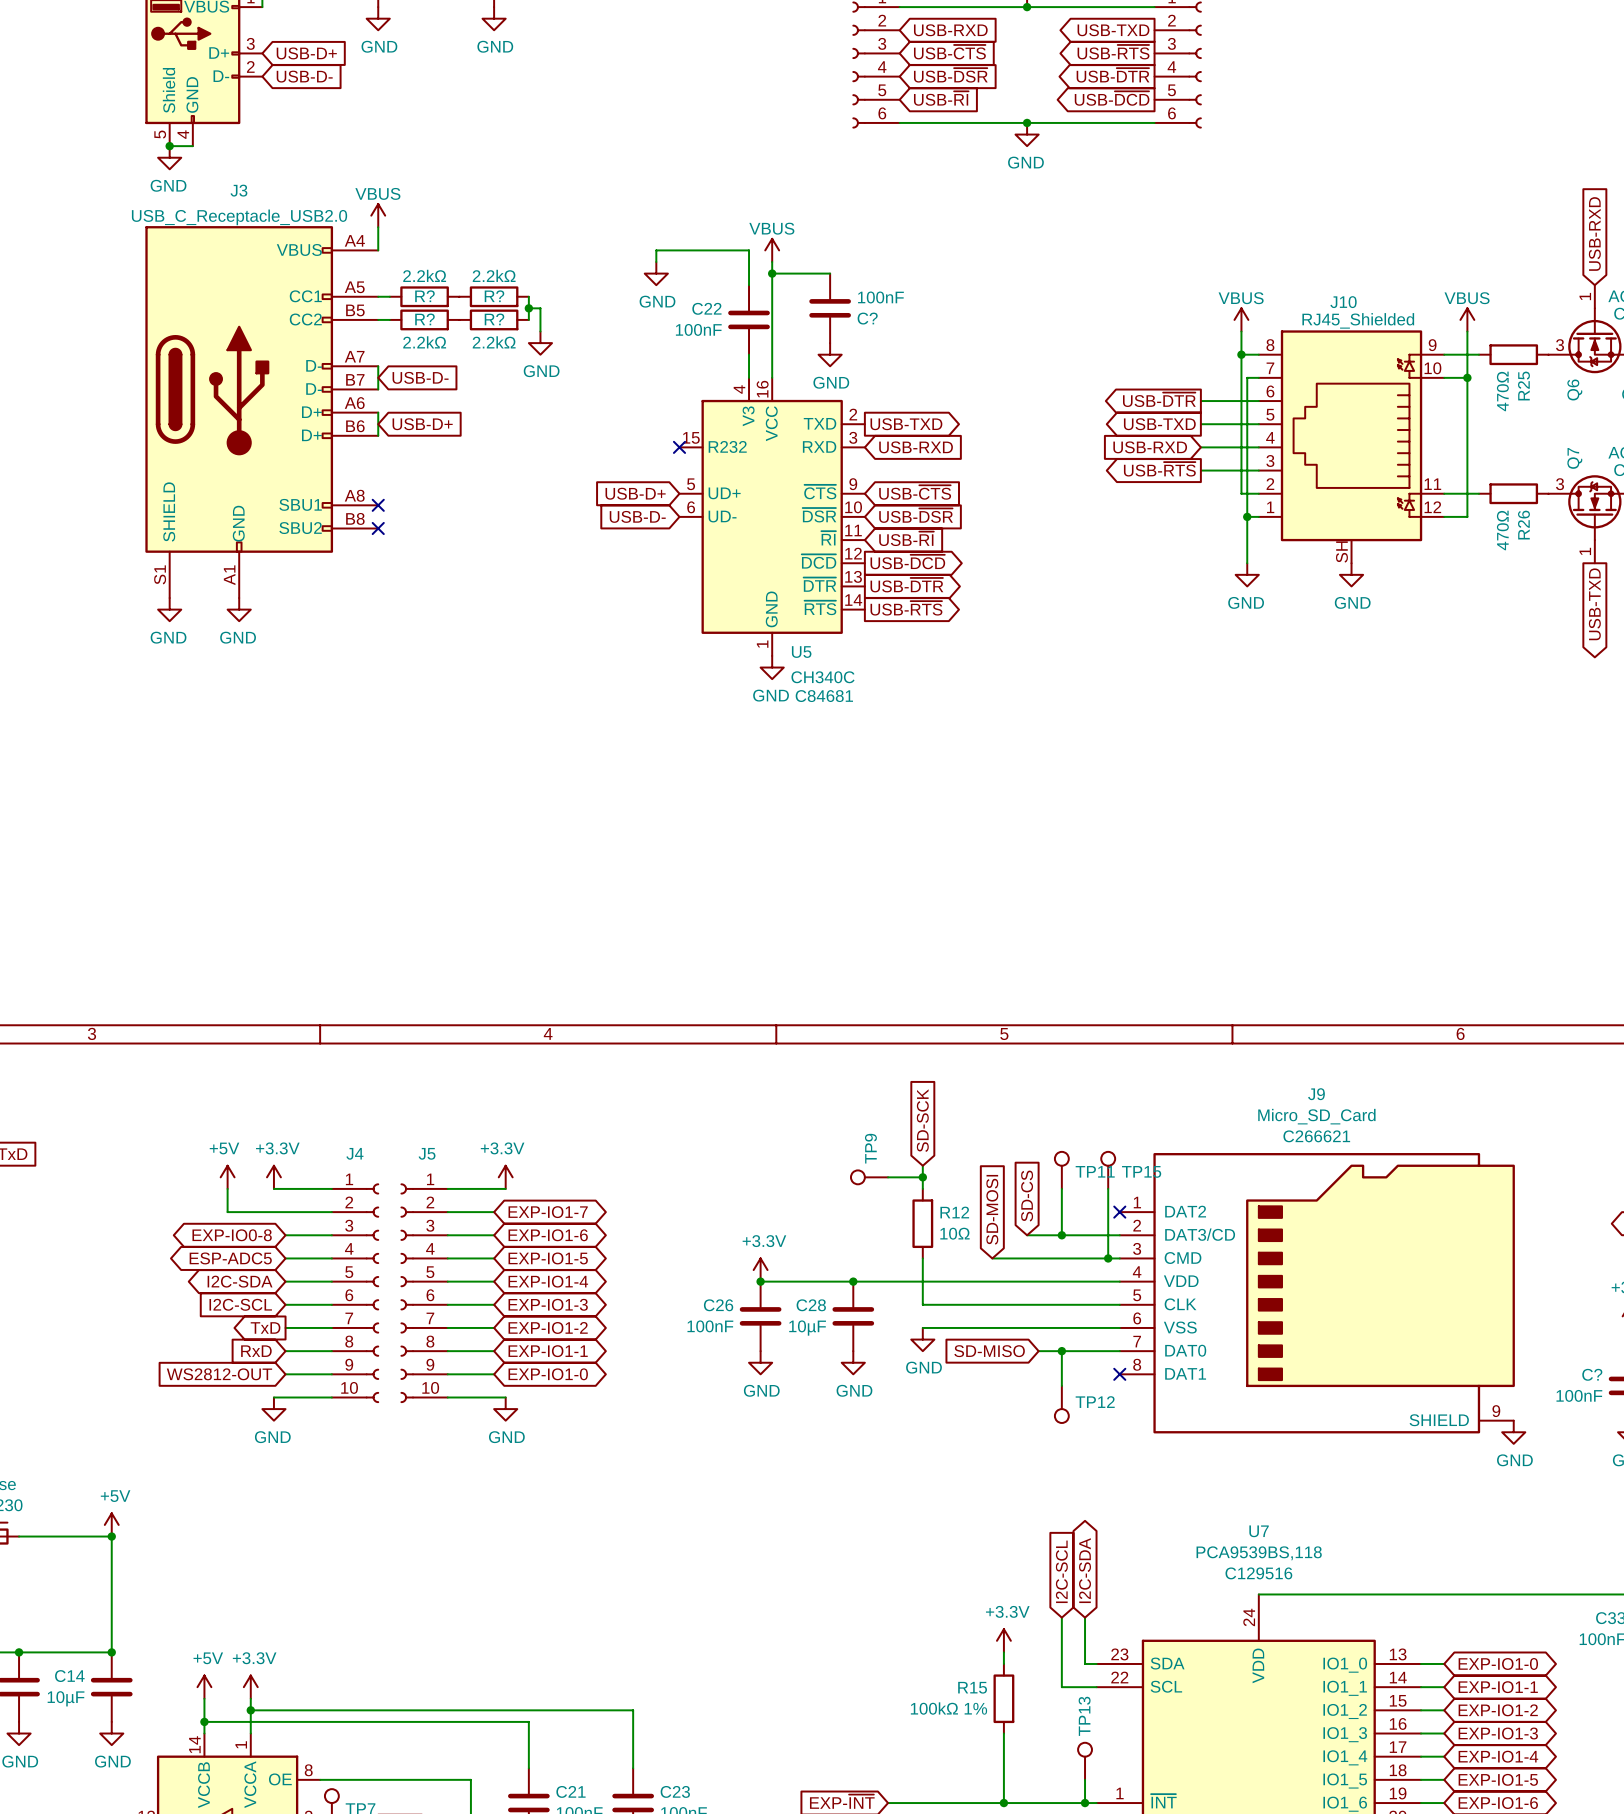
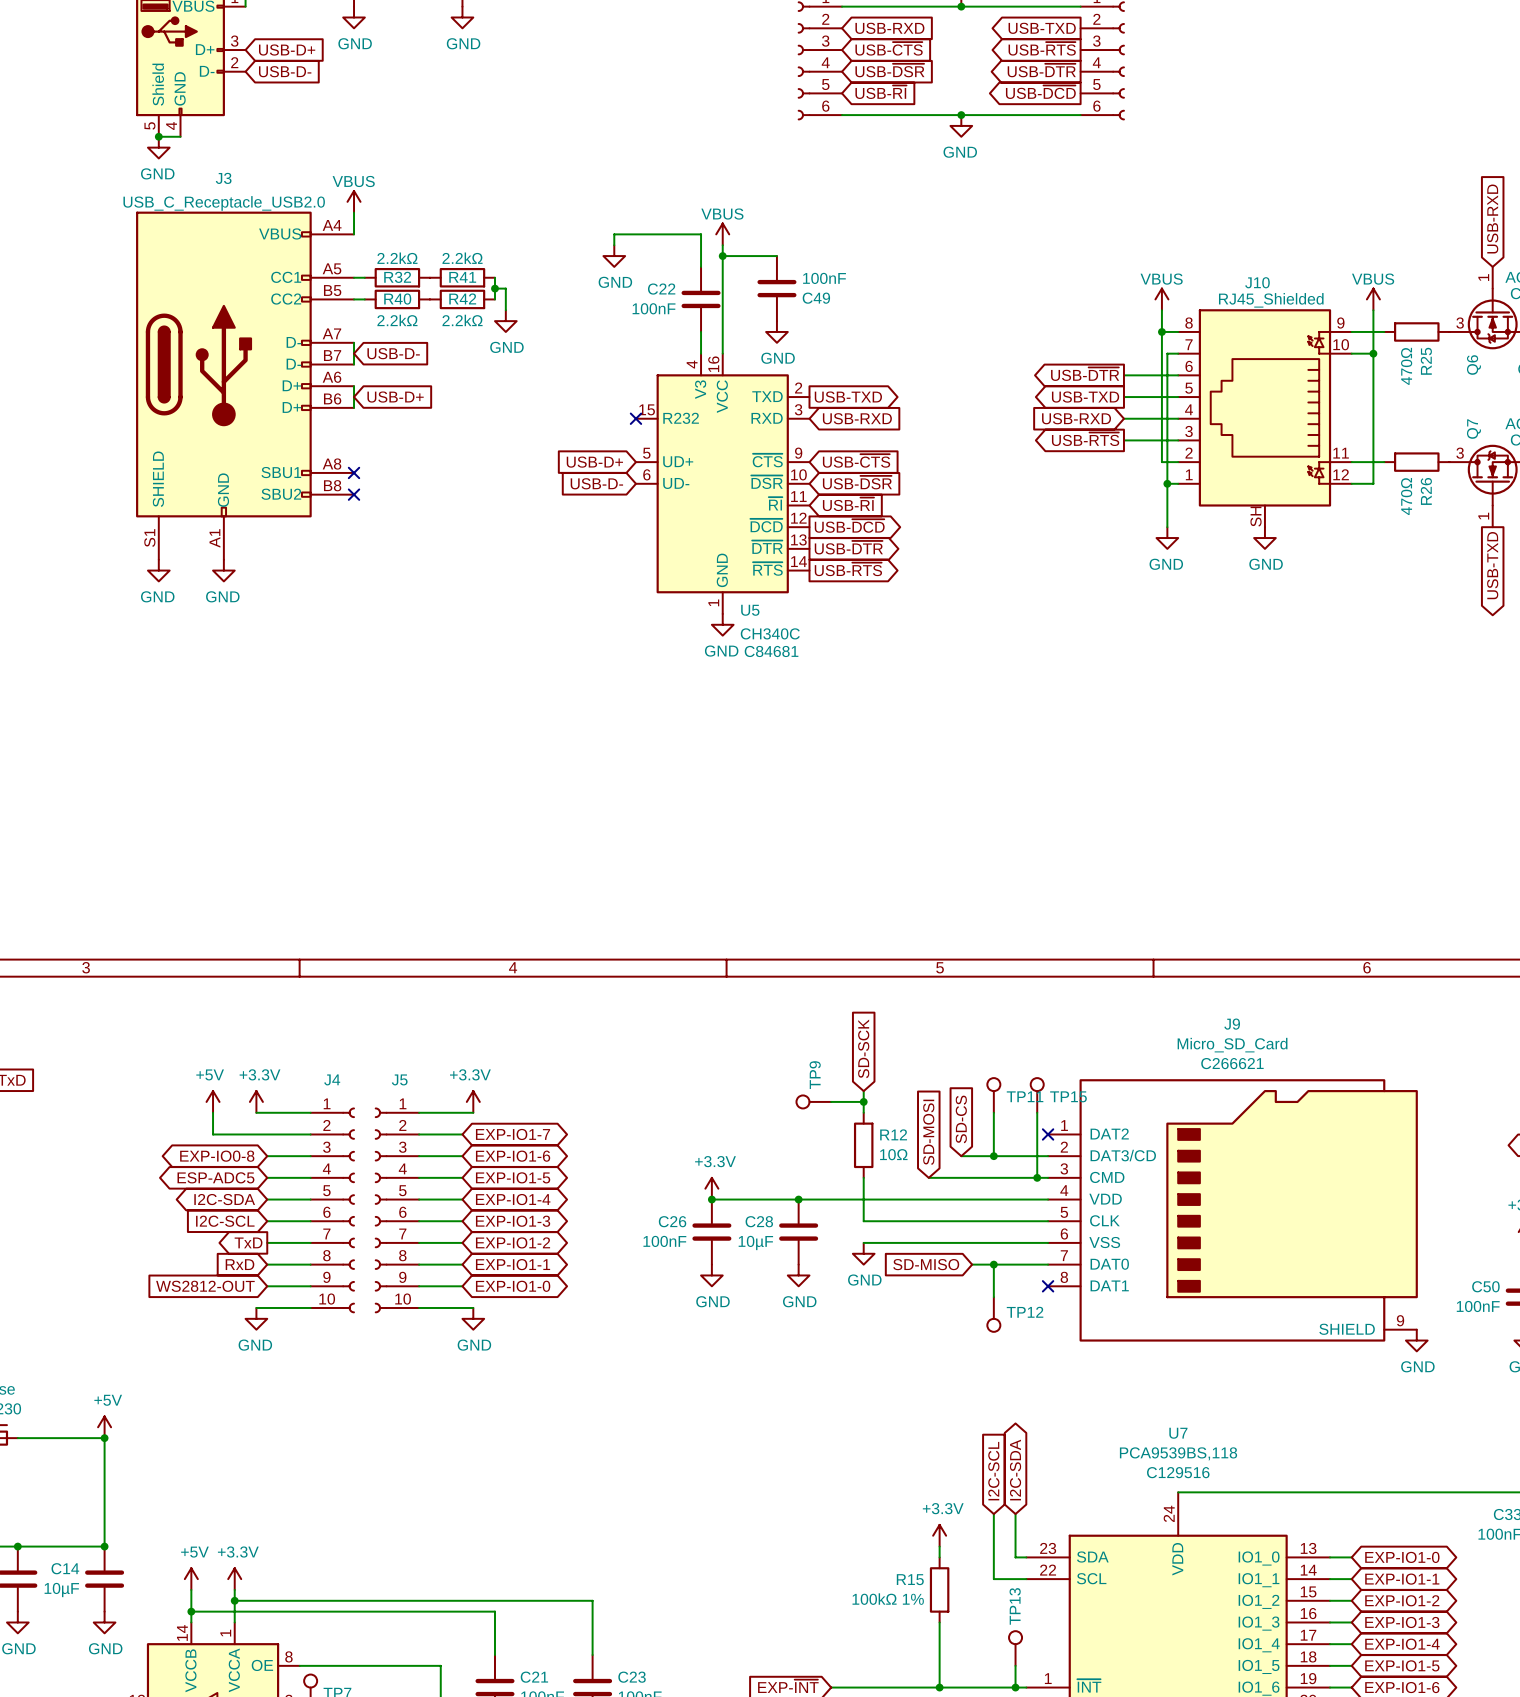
R? name: R? (424, 296) -> R32 (397, 277)
R? name: R? (494, 296) -> R41 (462, 277)
C? name: C? (867, 318) -> C49 (816, 298)
R? name: R? (424, 319) -> R40 (397, 299)
R? name: R? (494, 319) -> R42 (462, 298)
C? name: C? (1592, 1374) -> C50 (1485, 1286)

